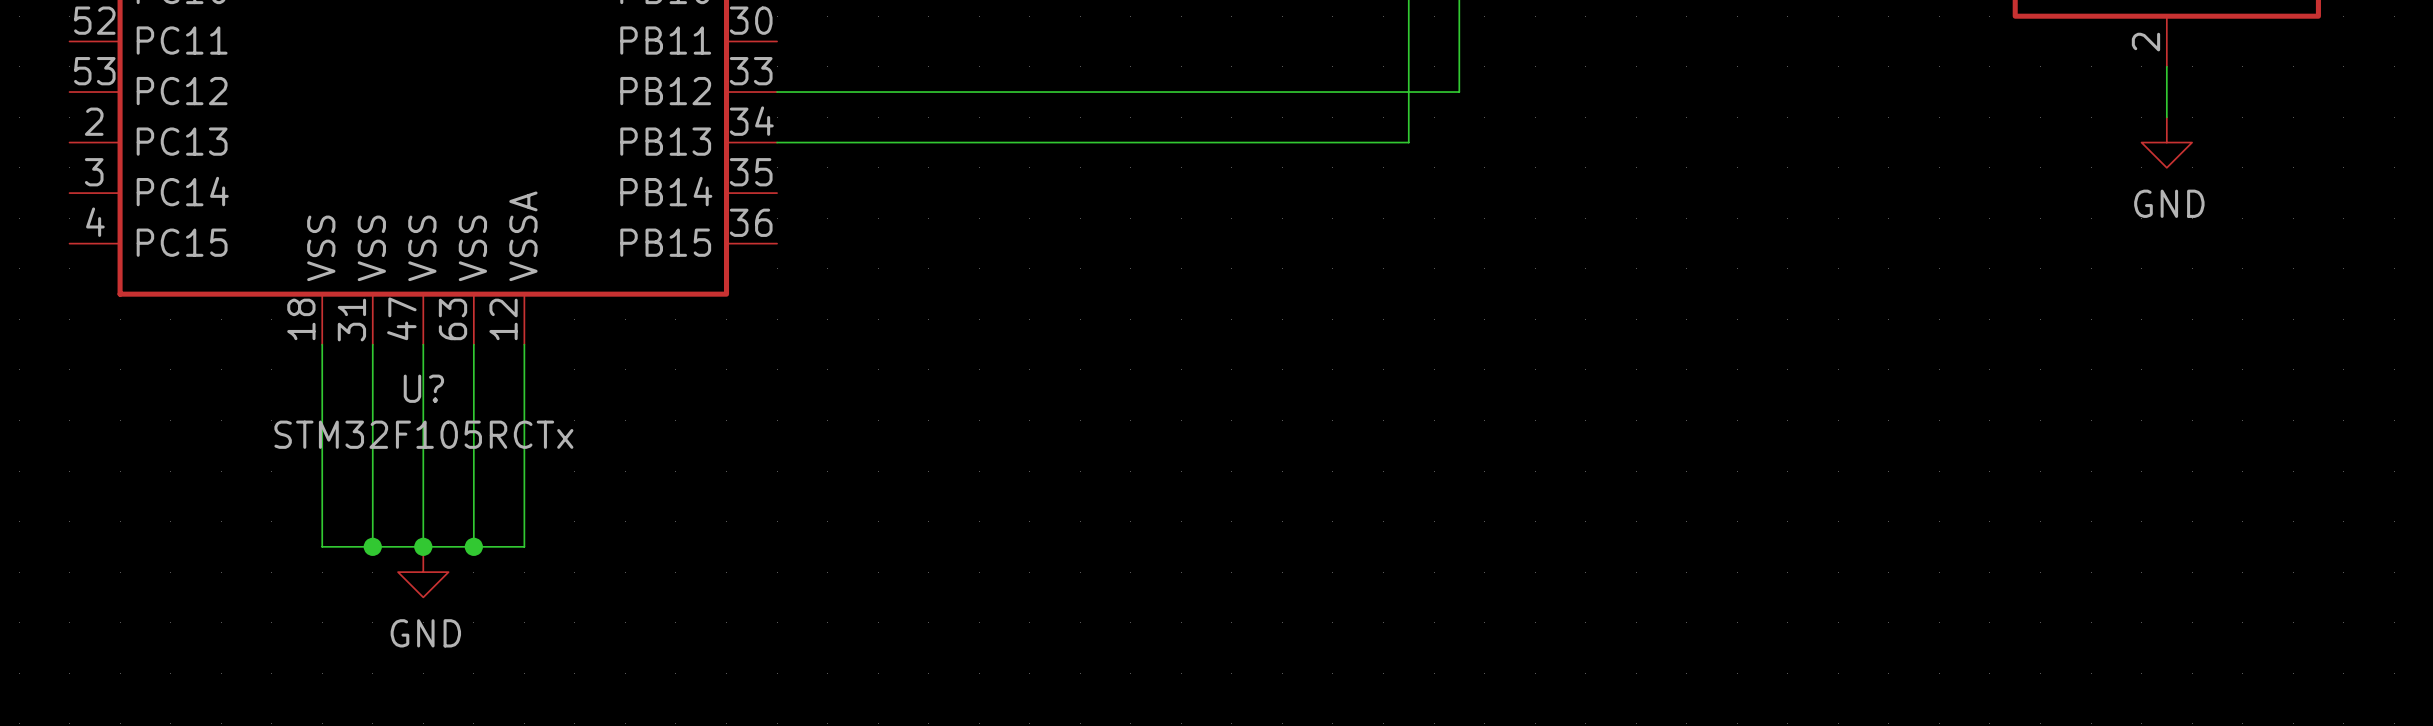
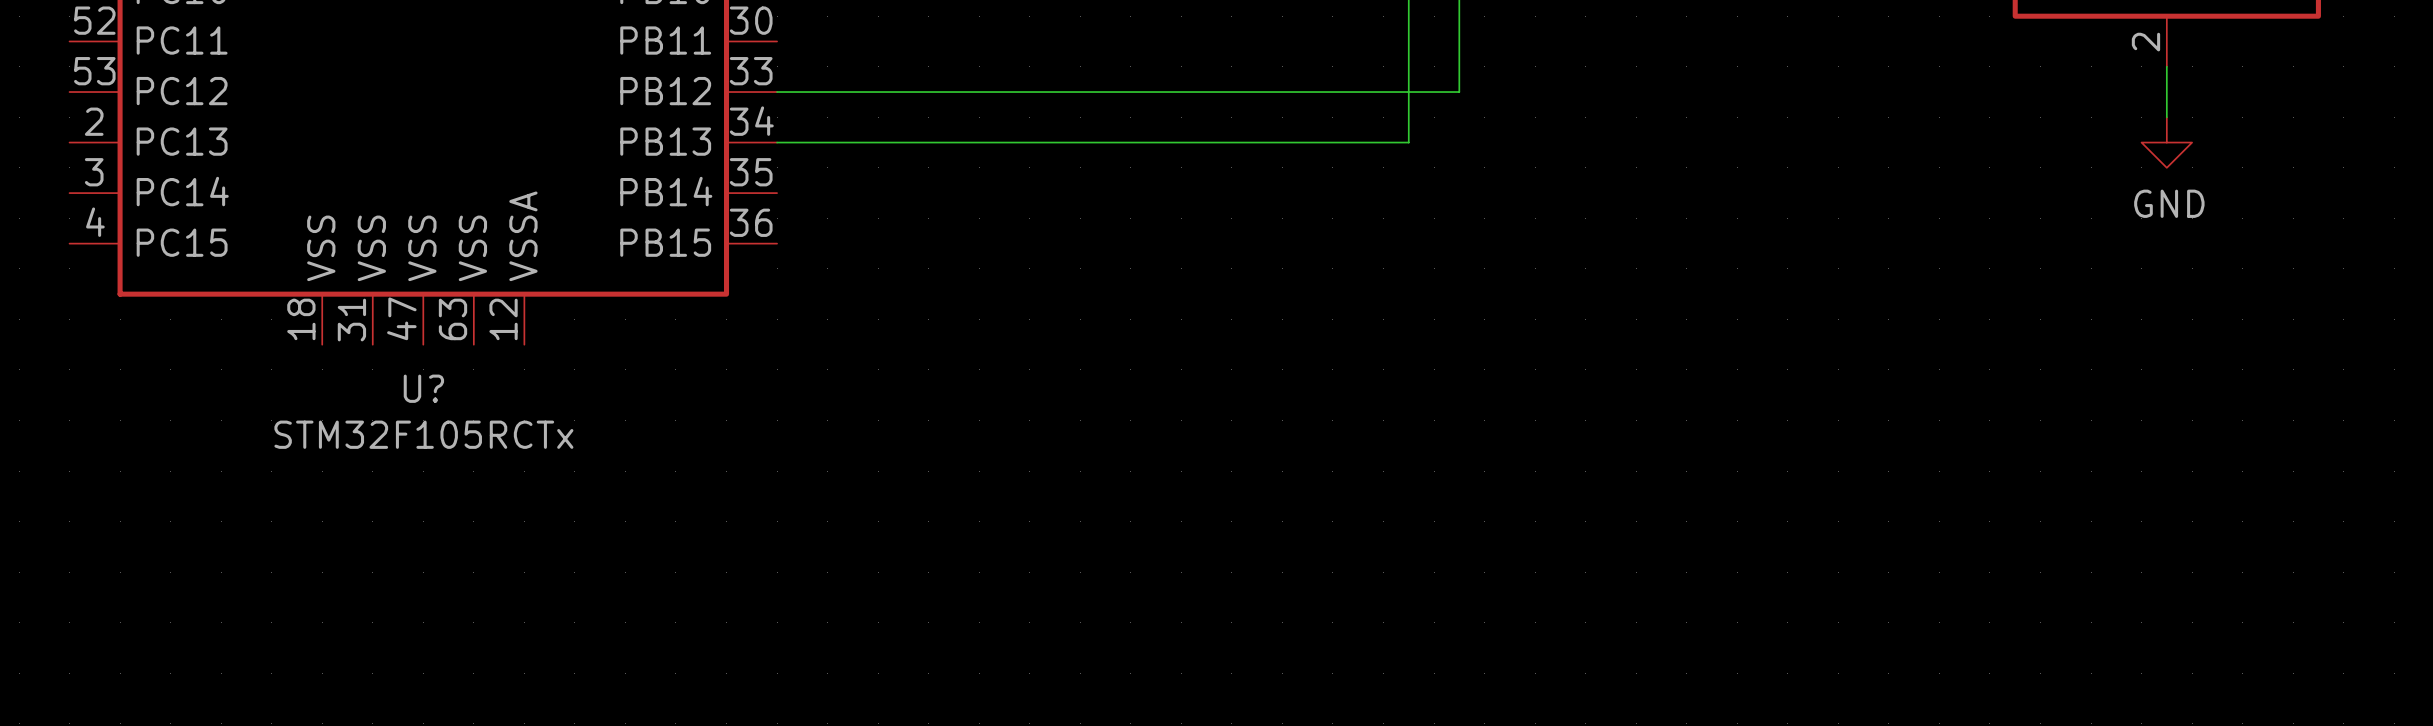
wire: (322, 344) (322, 546) (524, 546) (524, 344) -> none
wire: (372, 344) (372, 546) -> none
wire: (423, 344) (423, 546) -> none
wire: (473, 344) (473, 546) -> none
junction: (372, 546) -> none
junction: (423, 546) -> none
junction: (473, 546) -> none
power symbol: GND (423, 572) -> none

